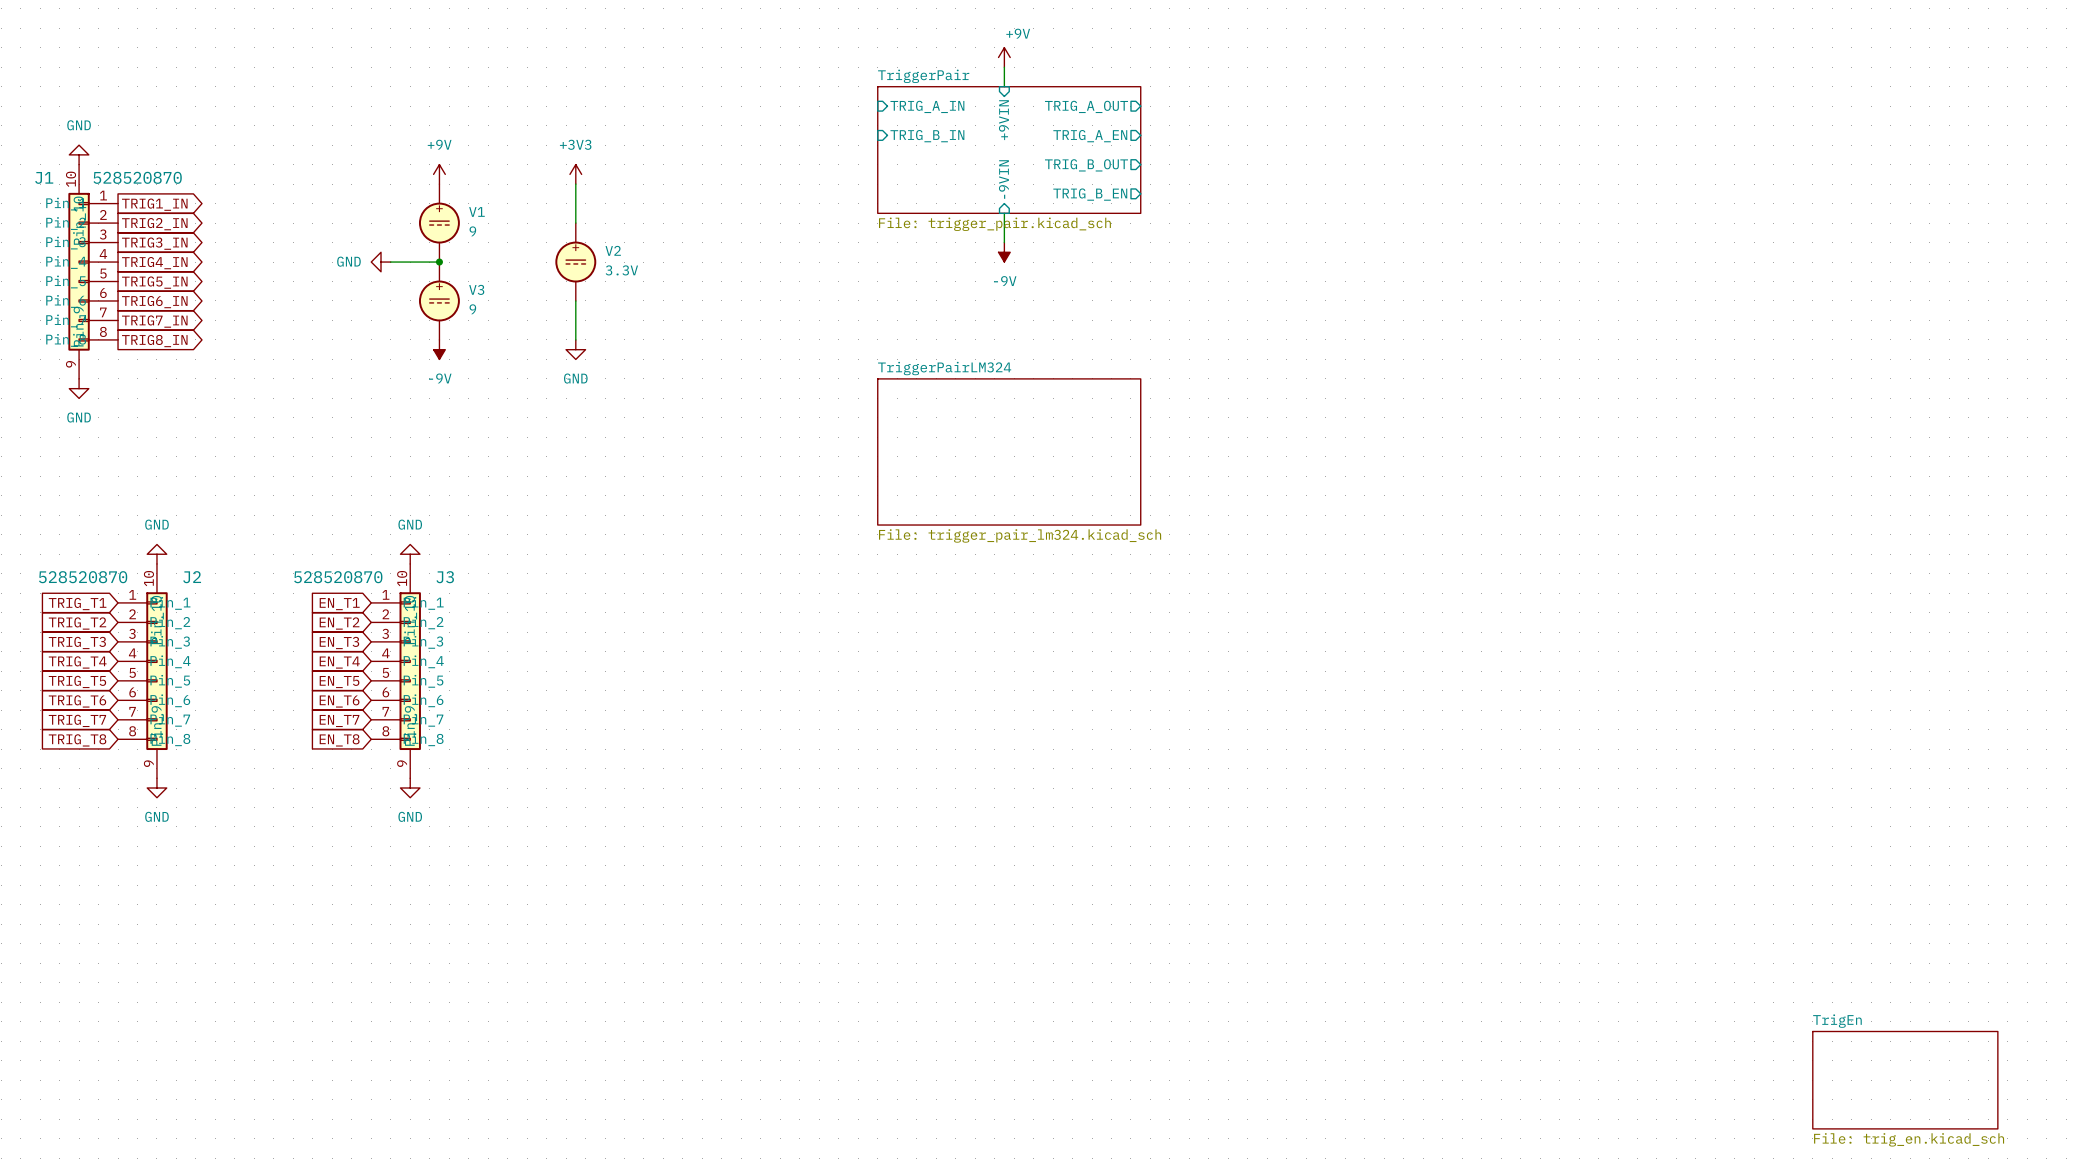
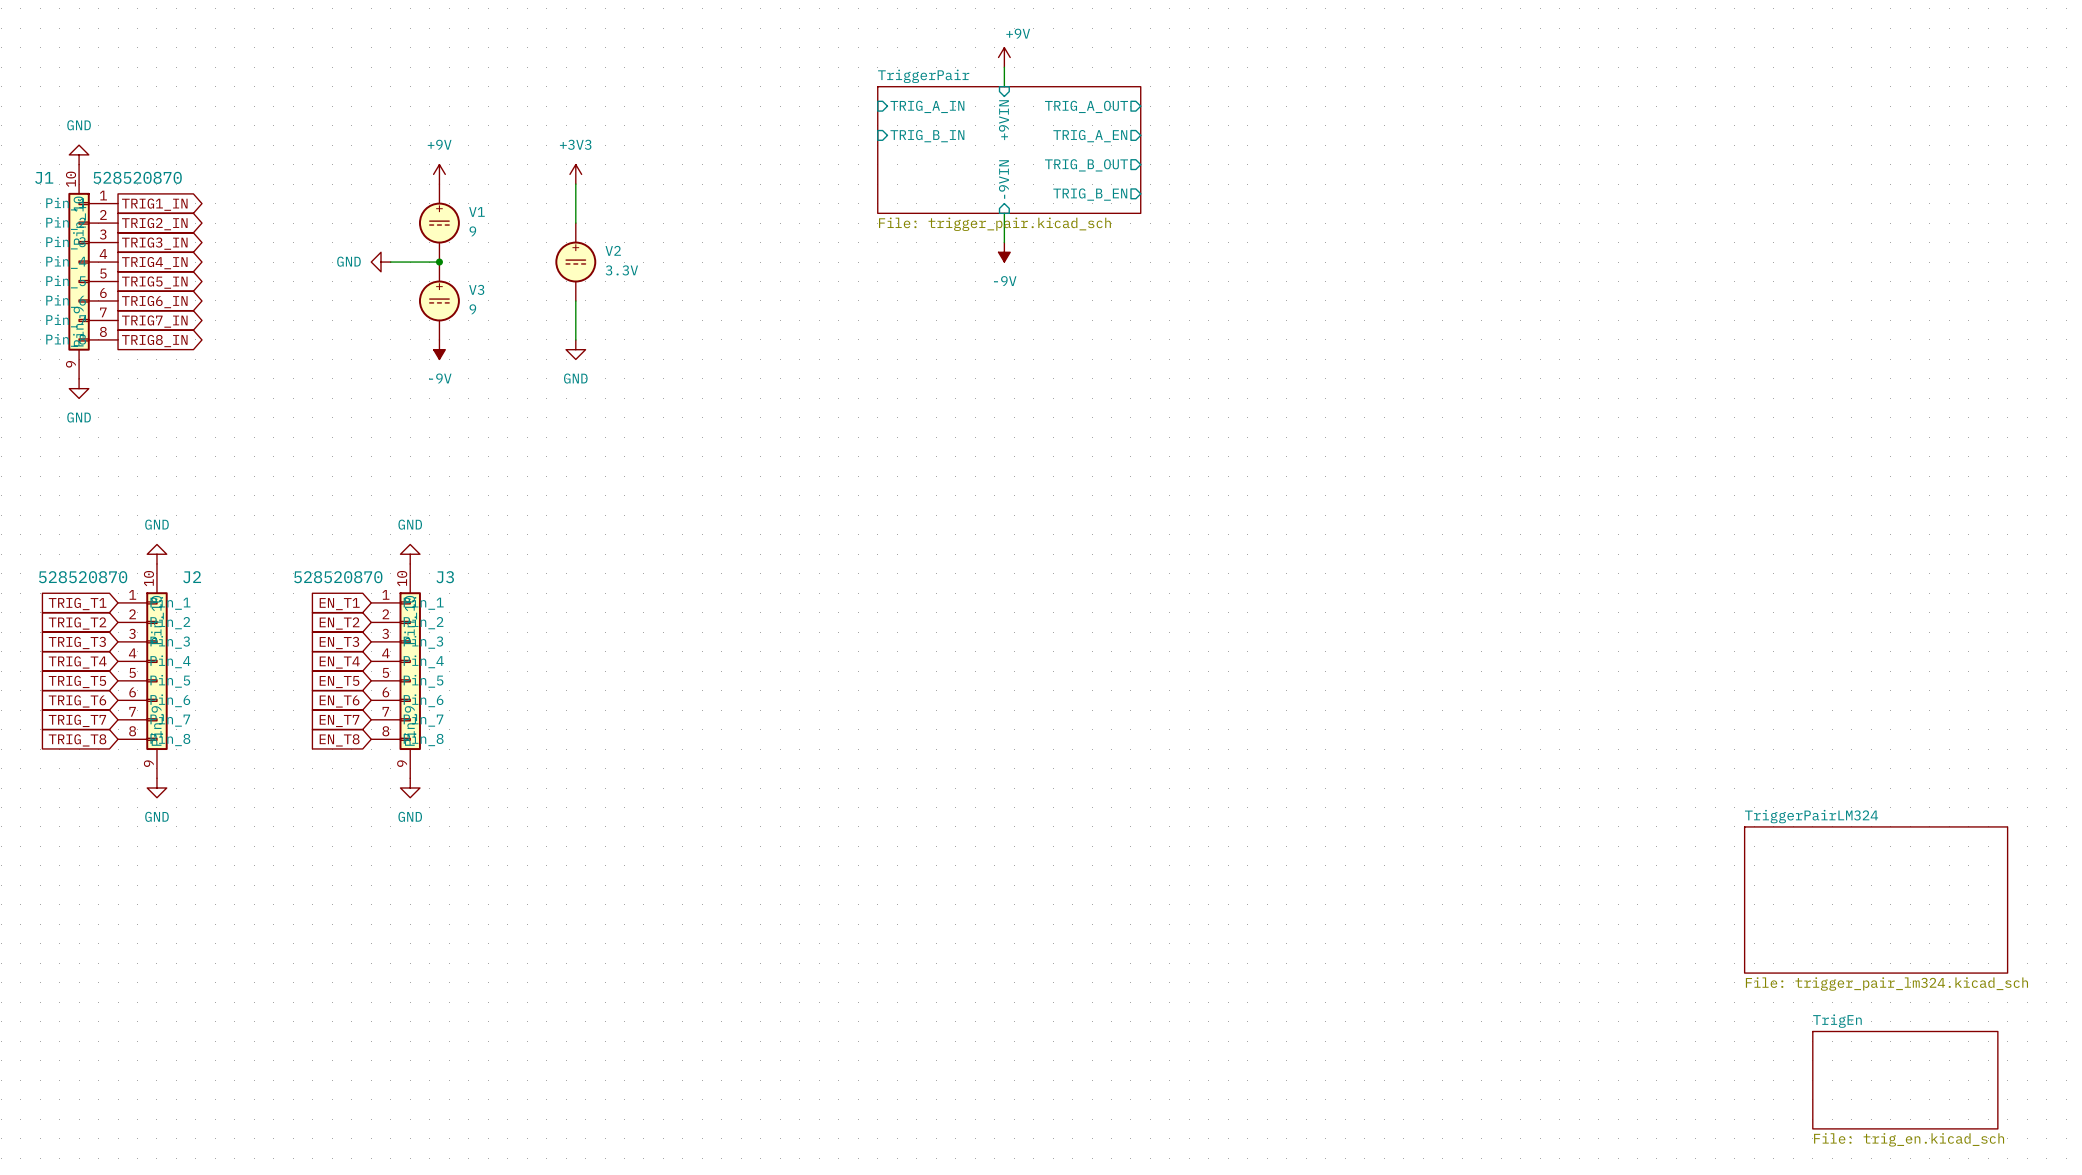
sheet TriggerPairLM324 position: (1009, 451) -> (1876, 900)

